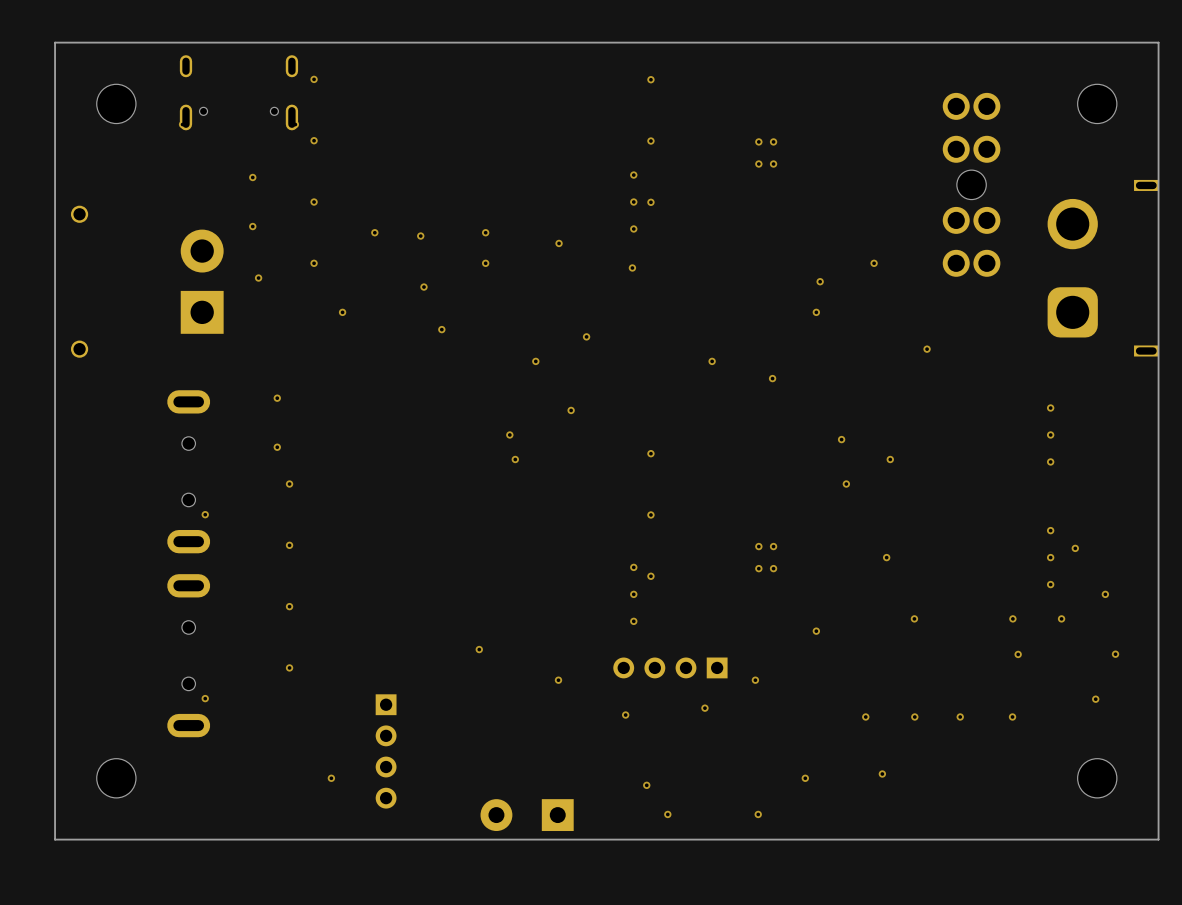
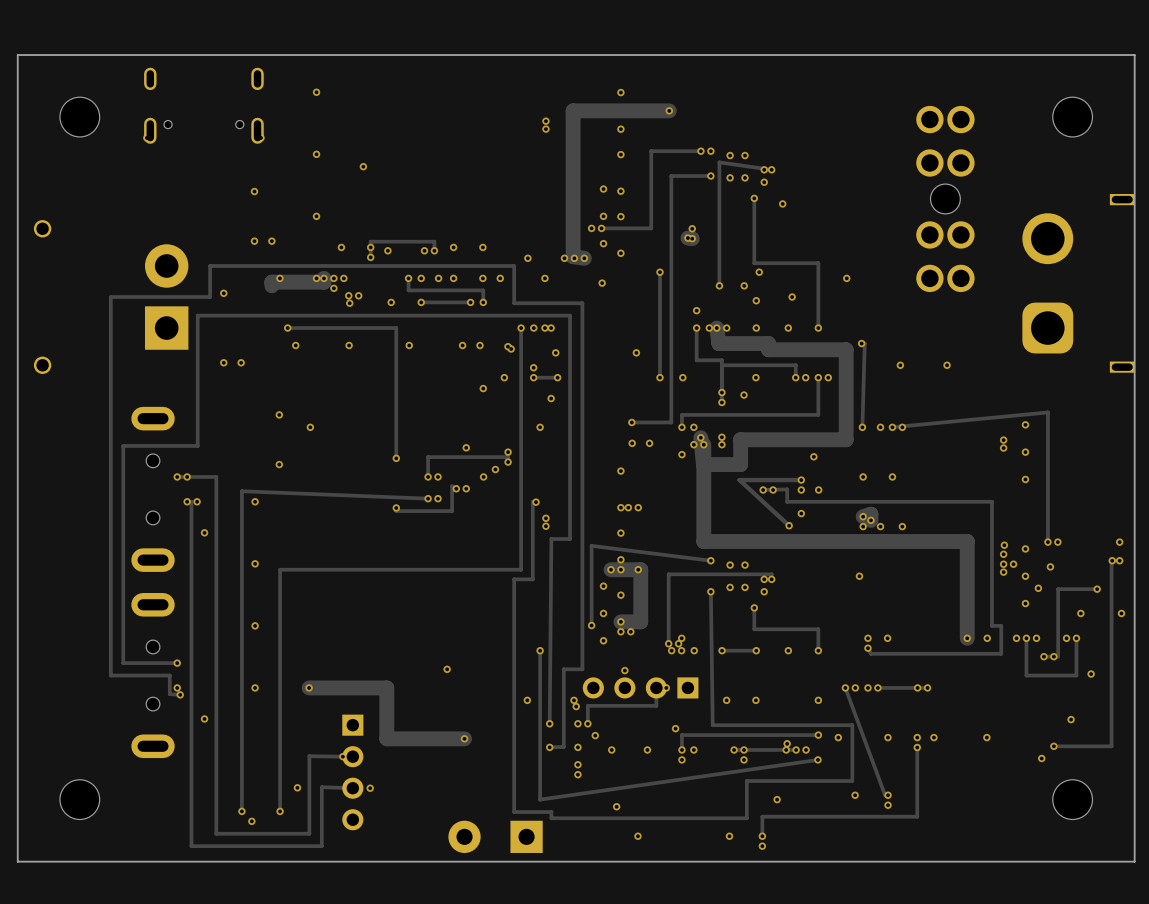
via: (314, 79) -> none
via: none -> (316, 92)
track: none -> (669, 110) (573, 110) (573, 256) (584, 258)
via: none -> (669, 110)
via: none -> (545, 121)
via: none -> (545, 129)
via: none -> (620, 129)
track: none -> (700, 151) (651, 151) (651, 228) (601, 228)
via: none -> (700, 151)
via: none -> (710, 151)
via: (314, 140) -> none
via: none -> (316, 154)
via: none -> (363, 166)
via: none -> (764, 169)
track: none -> (771, 169) (719, 162) (719, 285)
via: none -> (771, 169)
track: none -> (710, 176) (671, 176) (671, 422) (631, 422)
via: none -> (710, 176)
via: none -> (764, 182)
via: (252, 177) -> none
via: none -> (254, 191)
via: none -> (620, 191)
track: none -> (754, 198) (754, 263) (818, 263) (818, 328)
via: none -> (754, 198)
via: none -> (782, 203)
via: (314, 202) -> none
via: none -> (316, 216)
via: none -> (591, 228)
via: none -> (601, 228)
via: none -> (692, 228)
track: none -> (687, 238) (692, 238)
via: none -> (687, 238)
via: none -> (692, 238)
via: (252, 226) -> none
via: none -> (254, 241)
via: none -> (271, 241)
via: none -> (370, 247)
via: none -> (482, 247)
via: none -> (424, 250)
track: none -> (434, 250) (434, 241) (370, 241) (370, 257)
via: none -> (434, 250)
via: none -> (620, 253)
via: none -> (370, 257)
via: none -> (564, 258)
via: none -> (574, 258)
via: none -> (584, 258)
track: none -> (659, 272) (659, 377)
via: none -> (659, 272)
via: none -> (759, 272)
via: none -> (316, 278)
track: none -> (323, 278) (323, 282) (271, 282) (271, 285)
via: none -> (323, 278)
via: none -> (333, 278)
via: none -> (343, 278)
track: none -> (408, 278) (408, 290) (483, 290) (483, 302)
via: none -> (408, 278)
via: none -> (421, 278)
via: none -> (438, 278)
via: none -> (482, 278)
via: none -> (500, 278)
via: none -> (544, 278)
via: none -> (719, 285)
via: none -> (744, 285)
via: none -> (333, 288)
via: none -> (348, 295)
via: none -> (358, 295)
via: none -> (756, 300)
via: none -> (349, 303)
via: none -> (421, 302)
track: none -> (470, 302) (421, 302)
via: none -> (470, 302)
via: none -> (483, 302)
via: none -> (696, 310)
track: none -> (287, 328) (396, 328) (396, 458)
via: none -> (287, 328)
via: (342, 312) -> none
track: none -> (521, 328) (521, 569) (280, 569) (280, 811)
via: none -> (521, 328)
via: none -> (533, 328)
via: none -> (544, 328)
via: none -> (551, 328)
track: none -> (696, 328) (696, 360) (721, 360) (721, 402)
via: none -> (696, 328)
via: none -> (709, 328)
track: none -> (716, 328) (718, 343) (768, 343) (768, 349) (846, 349) (846, 439) (740, 439) (740, 464) (703, 464) (700, 437)
via: none -> (716, 328)
via: none -> (726, 328)
via: none -> (756, 328)
via: none -> (818, 328)
track: none -> (861, 343) (864, 343) (862, 427)
via: none -> (861, 343)
via: none -> (295, 345)
via: none -> (349, 345)
via: none -> (462, 345)
via: none -> (479, 345)
via: none -> (507, 346)
via: none -> (511, 349)
via: none -> (636, 352)
via: none -> (223, 362)
via: none -> (241, 362)
track: none -> (721, 365) (795, 365) (795, 377)
via: none -> (947, 365)
via: none -> (533, 367)
via: none -> (533, 377)
track: none -> (557, 377) (533, 377)
via: none -> (557, 377)
via: none -> (659, 377)
via: none -> (755, 377)
via: none -> (795, 377)
via: none -> (805, 377)
track: none -> (818, 377) (818, 414) (681, 414) (681, 427)
via: none -> (818, 377)
via: none -> (828, 377)
via: none -> (483, 388)
via: none -> (721, 392)
via: none -> (551, 398)
via: none -> (721, 402)
via: (277, 398) -> none
via: none -> (279, 414)
via: none -> (631, 422)
via: none -> (310, 427)
via: none -> (681, 427)
via: none -> (693, 427)
via: none -> (862, 427)
via: none -> (880, 427)
track: none -> (892, 427) (1047, 412) (1047, 542)
via: none -> (892, 427)
via: none -> (902, 427)
via: none -> (700, 437)
via: none -> (721, 437)
via: none -> (1003, 440)
via: none -> (632, 443)
via: none -> (649, 443)
via: none -> (693, 444)
track: none -> (703, 444) (703, 541) (967, 541) (967, 638)
via: none -> (703, 444)
via: none -> (721, 444)
via: none -> (466, 447)
via: none -> (1003, 448)
via: (509, 434) -> none
via: none -> (508, 452)
via: none -> (681, 454)
via: none -> (396, 458)
track: none -> (508, 462) (508, 457) (428, 457) (428, 476)
via: none -> (508, 462)
via: (277, 447) -> none
via: none -> (279, 464)
via: none -> (495, 469)
track: none -> (177, 476) (216, 476) (216, 833) (309, 833) (309, 756) (342, 756)
via: none -> (177, 476)
via: none -> (187, 476)
via: none -> (428, 476)
via: none -> (438, 476)
via: none -> (892, 476)
track: none -> (801, 480) (739, 480) (789, 525)
via: none -> (801, 480)
track: none -> (456, 488) (452, 486) (452, 511) (396, 511) (396, 507)
via: none -> (456, 488)
via: none -> (466, 488)
track: none -> (763, 489) (787, 489) (787, 501) (991, 501) (991, 625) (1001, 625) (1001, 653) (870, 653) (867, 648)
via: none -> (763, 489)
via: none -> (773, 489)
via: none -> (801, 489)
via: none -> (818, 489)
track: none -> (428, 498) (241, 491) (241, 811)
via: none -> (428, 498)
via: none -> (438, 498)
track: none -> (187, 501) (191, 501) (191, 846) (321, 846) (321, 787) (352, 788)
via: none -> (187, 501)
via: none -> (197, 501)
track: none -> (536, 502) (532, 501) (532, 579) (514, 579) (514, 812) (551, 812) (551, 818) (746, 818) (746, 781) (852, 781) (852, 725) (712, 725) (710, 591)
via: none -> (536, 502)
via: (846, 484) -> none
via: none -> (620, 507)
via: none -> (628, 507)
via: none -> (638, 507)
via: none -> (396, 507)
via: none -> (801, 513)
track: none -> (863, 516) (870, 514) (870, 520)
via: none -> (863, 516)
via: none -> (545, 518)
via: none -> (870, 520)
via: none -> (789, 525)
via: none -> (545, 526)
via: none -> (863, 526)
via: none -> (880, 526)
via: none -> (902, 526)
via: (205, 514) -> none
via: none -> (204, 532)
via: none -> (1047, 542)
via: none -> (1057, 542)
via: none -> (1119, 542)
via: none -> (1004, 545)
via: none -> (1003, 554)
via: none -> (620, 559)
track: none -> (710, 560) (591, 545) (591, 625)
via: none -> (710, 560)
via: none -> (1112, 560)
track: none -> (1119, 560) (1111, 560) (1111, 746) (1053, 746)
via: none -> (1119, 560)
via: none -> (1003, 564)
via: none -> (1013, 564)
track: none -> (610, 569) (640, 569) (640, 621) (620, 621)
via: none -> (610, 569)
via: none -> (620, 569)
via: none -> (638, 569)
via: none -> (1003, 572)
via: none -> (764, 579)
track: none -> (771, 579) (771, 574) (668, 574) (668, 643)
via: none -> (771, 579)
via: none -> (1038, 588)
track: none -> (1097, 589) (1058, 589) (1058, 656) (1043, 656)
via: none -> (1097, 589)
via: none -> (710, 591)
via: none -> (764, 591)
track: none -> (754, 607) (754, 629) (818, 629) (818, 650)
via: none -> (754, 607)
via: none -> (1121, 613)
via: none -> (620, 621)
via: none -> (591, 625)
via: none -> (620, 631)
via: none -> (630, 631)
via: none -> (681, 638)
via: none -> (867, 638)
via: none -> (967, 638)
via: none -> (1016, 638)
via: none -> (1026, 638)
via: none -> (1066, 638)
track: none -> (1076, 638) (1076, 675) (1026, 675) (1026, 638)
via: none -> (1076, 638)
via: none -> (668, 643)
via: none -> (678, 643)
via: none -> (867, 648)
track: none -> (540, 650) (540, 799) (817, 759)
via: none -> (540, 650)
via: none -> (671, 650)
via: none -> (681, 650)
via: none -> (694, 650)
via: none -> (722, 650)
track: none -> (756, 650) (722, 650)
via: none -> (756, 650)
via: none -> (818, 650)
via: none -> (1043, 656)
via: none -> (1053, 656)
track: none -> (177, 663) (123, 663) (123, 445) (197, 445) (197, 315) (570, 315) (570, 539) (551, 539) (549, 723)
via: none -> (177, 663)
via: none -> (624, 670)
via: (1018, 654) -> none
via: none -> (177, 687)
track: none -> (309, 687) (386, 687) (386, 738) (464, 738)
via: none -> (309, 687)
track: none -> (656, 687) (656, 705) (587, 705) (587, 723)
via: none -> (666, 687)
track: none -> (845, 687) (885, 795) (888, 795)
via: none -> (845, 687)
via: none -> (855, 687)
via: none -> (867, 687)
via: none -> (877, 687)
via: none -> (917, 687)
track: none -> (927, 687) (877, 687)
via: none -> (927, 687)
track: none -> (180, 694) (169, 694) (169, 675) (110, 675) (110, 297) (210, 297) (210, 265) (514, 265) (514, 303) (582, 303) (582, 669) (563, 669) (563, 746) (549, 747)
via: none -> (180, 694)
via: none -> (573, 700)
via: none -> (755, 700)
via: none -> (818, 700)
via: none -> (576, 706)
via: (205, 698) -> none
via: none -> (204, 718)
via: none -> (549, 723)
via: none -> (577, 723)
via: none -> (587, 723)
track: none -> (818, 735) (681, 735) (681, 749)
via: none -> (818, 735)
via: none -> (917, 737)
via: none -> (464, 738)
via: none -> (787, 743)
via: none -> (1053, 746)
via: none -> (549, 747)
via: none -> (577, 747)
track: none -> (917, 747) (917, 816) (762, 816) (762, 836)
via: none -> (917, 747)
via: none -> (611, 749)
via: none -> (647, 749)
via: none -> (681, 749)
via: none -> (693, 749)
via: none -> (734, 749)
via: none -> (744, 749)
via: none -> (786, 749)
track: none -> (796, 749) (734, 749)
via: none -> (796, 749)
via: none -> (806, 749)
via: none -> (342, 756)
via: none -> (1041, 758)
via: none -> (681, 759)
via: none -> (744, 759)
via: none -> (817, 759)
via: none -> (577, 764)
via: none -> (577, 774)
via: none -> (297, 787)
via: none -> (370, 788)
via: none -> (888, 795)
via: (331, 778) -> none
via: none -> (888, 805)
via: none -> (241, 811)
via: none -> (280, 811)
via: none -> (251, 821)
via: none -> (762, 836)
via: none -> (762, 846)

